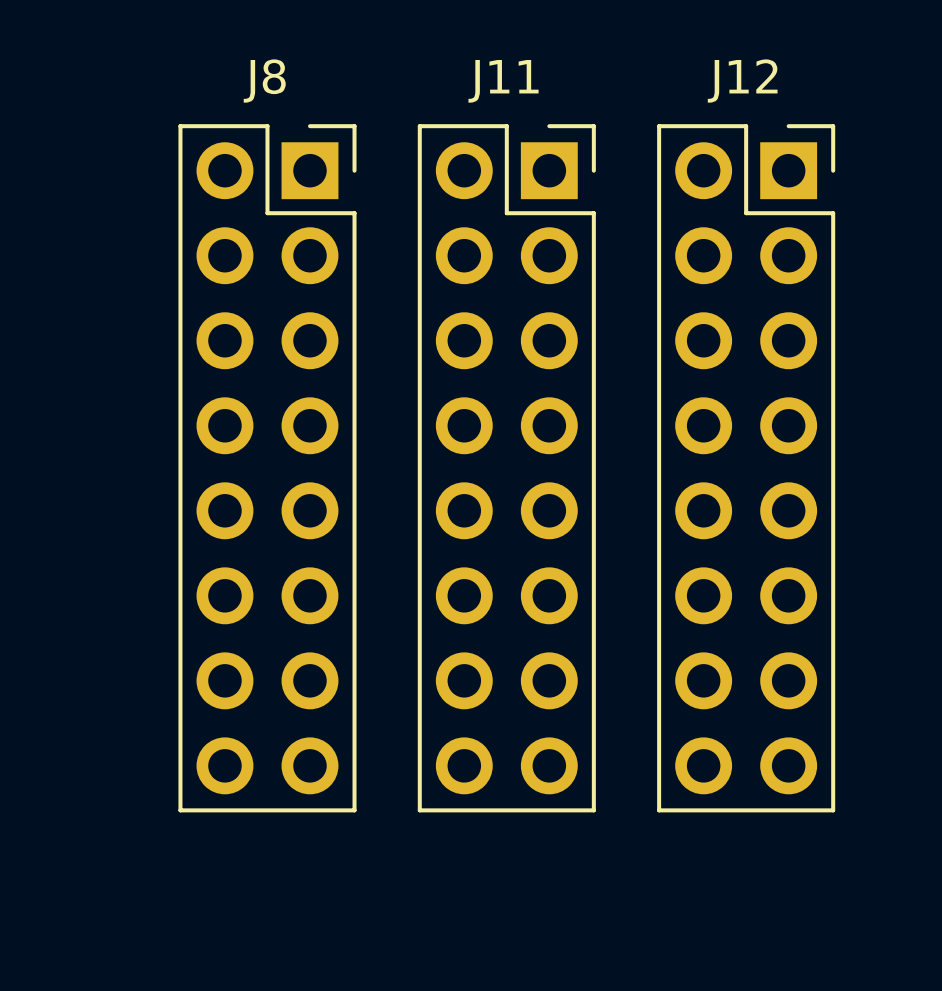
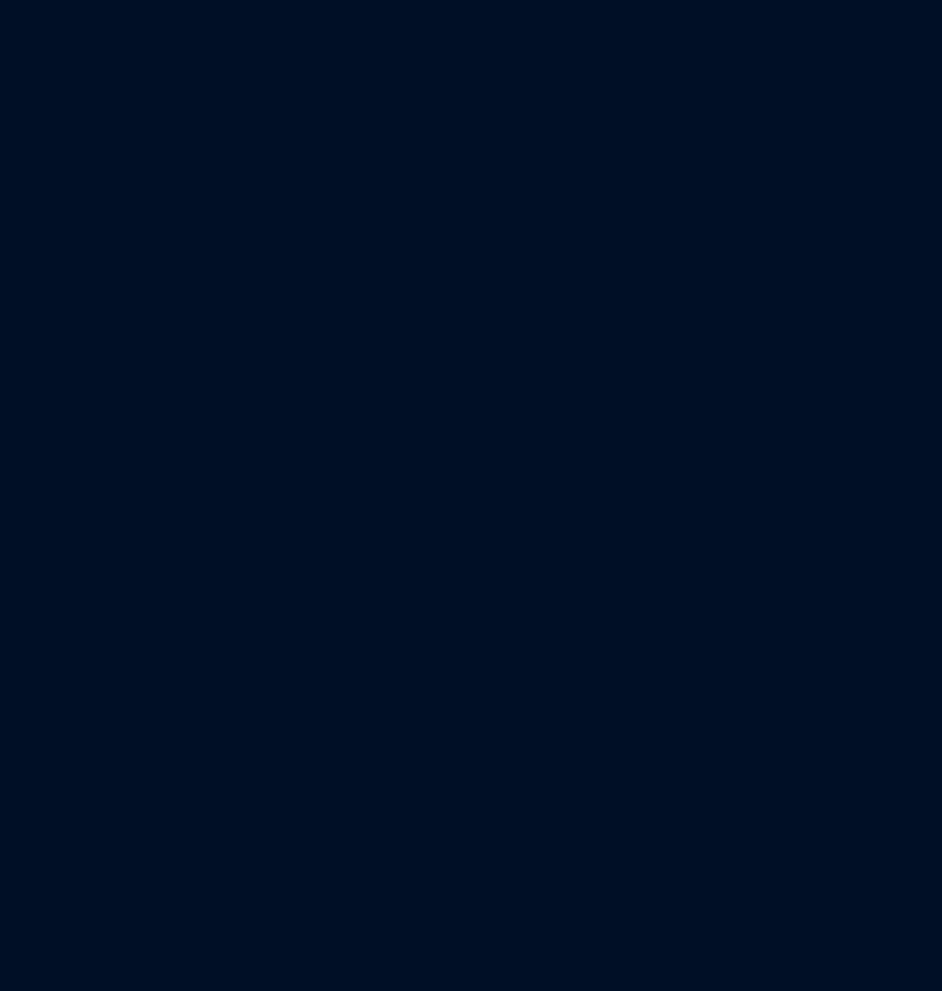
J8: (267, 468) -> none
J11: (506, 468) -> none
J12: (746, 468) -> none

